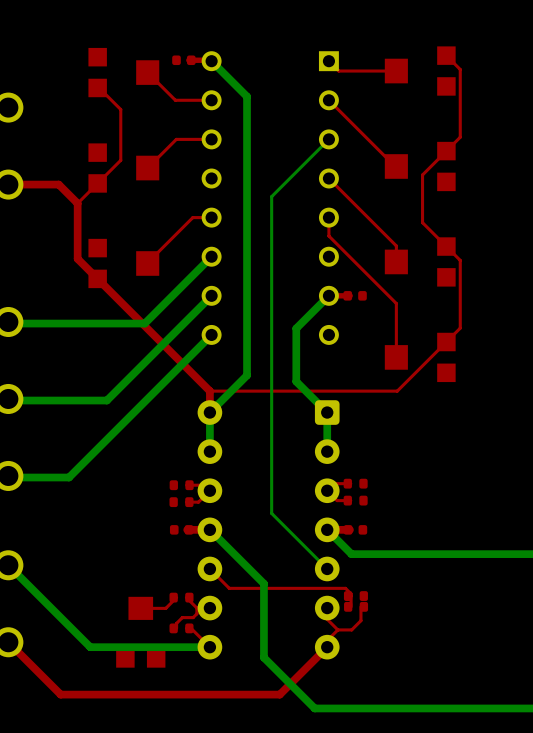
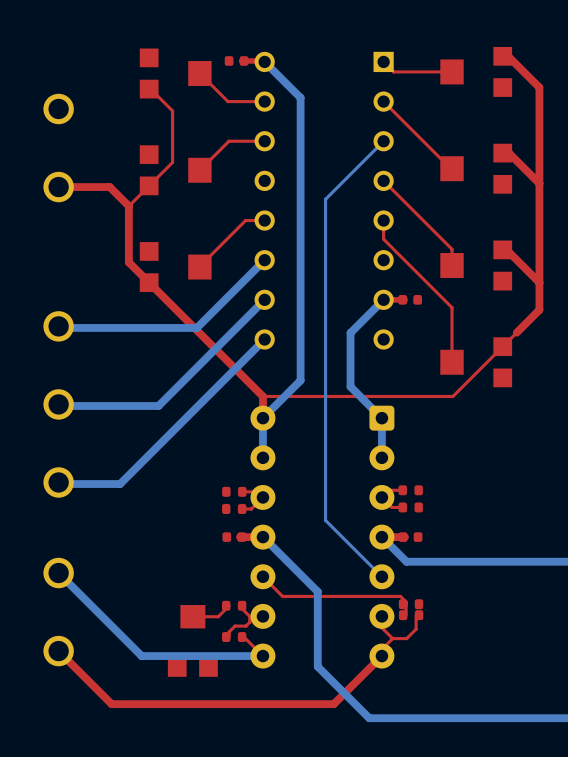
top track: (446, 55) (460, 69) (460, 137) (422, 174) (422, 222) (460, 260) (460, 328) -> (502, 56) (508, 56) (539, 87) (539, 309) (516, 332)
top track: none -> (502, 153) (508, 153) (539, 183)
top track: none -> (502, 249) (506, 249) (539, 282)

